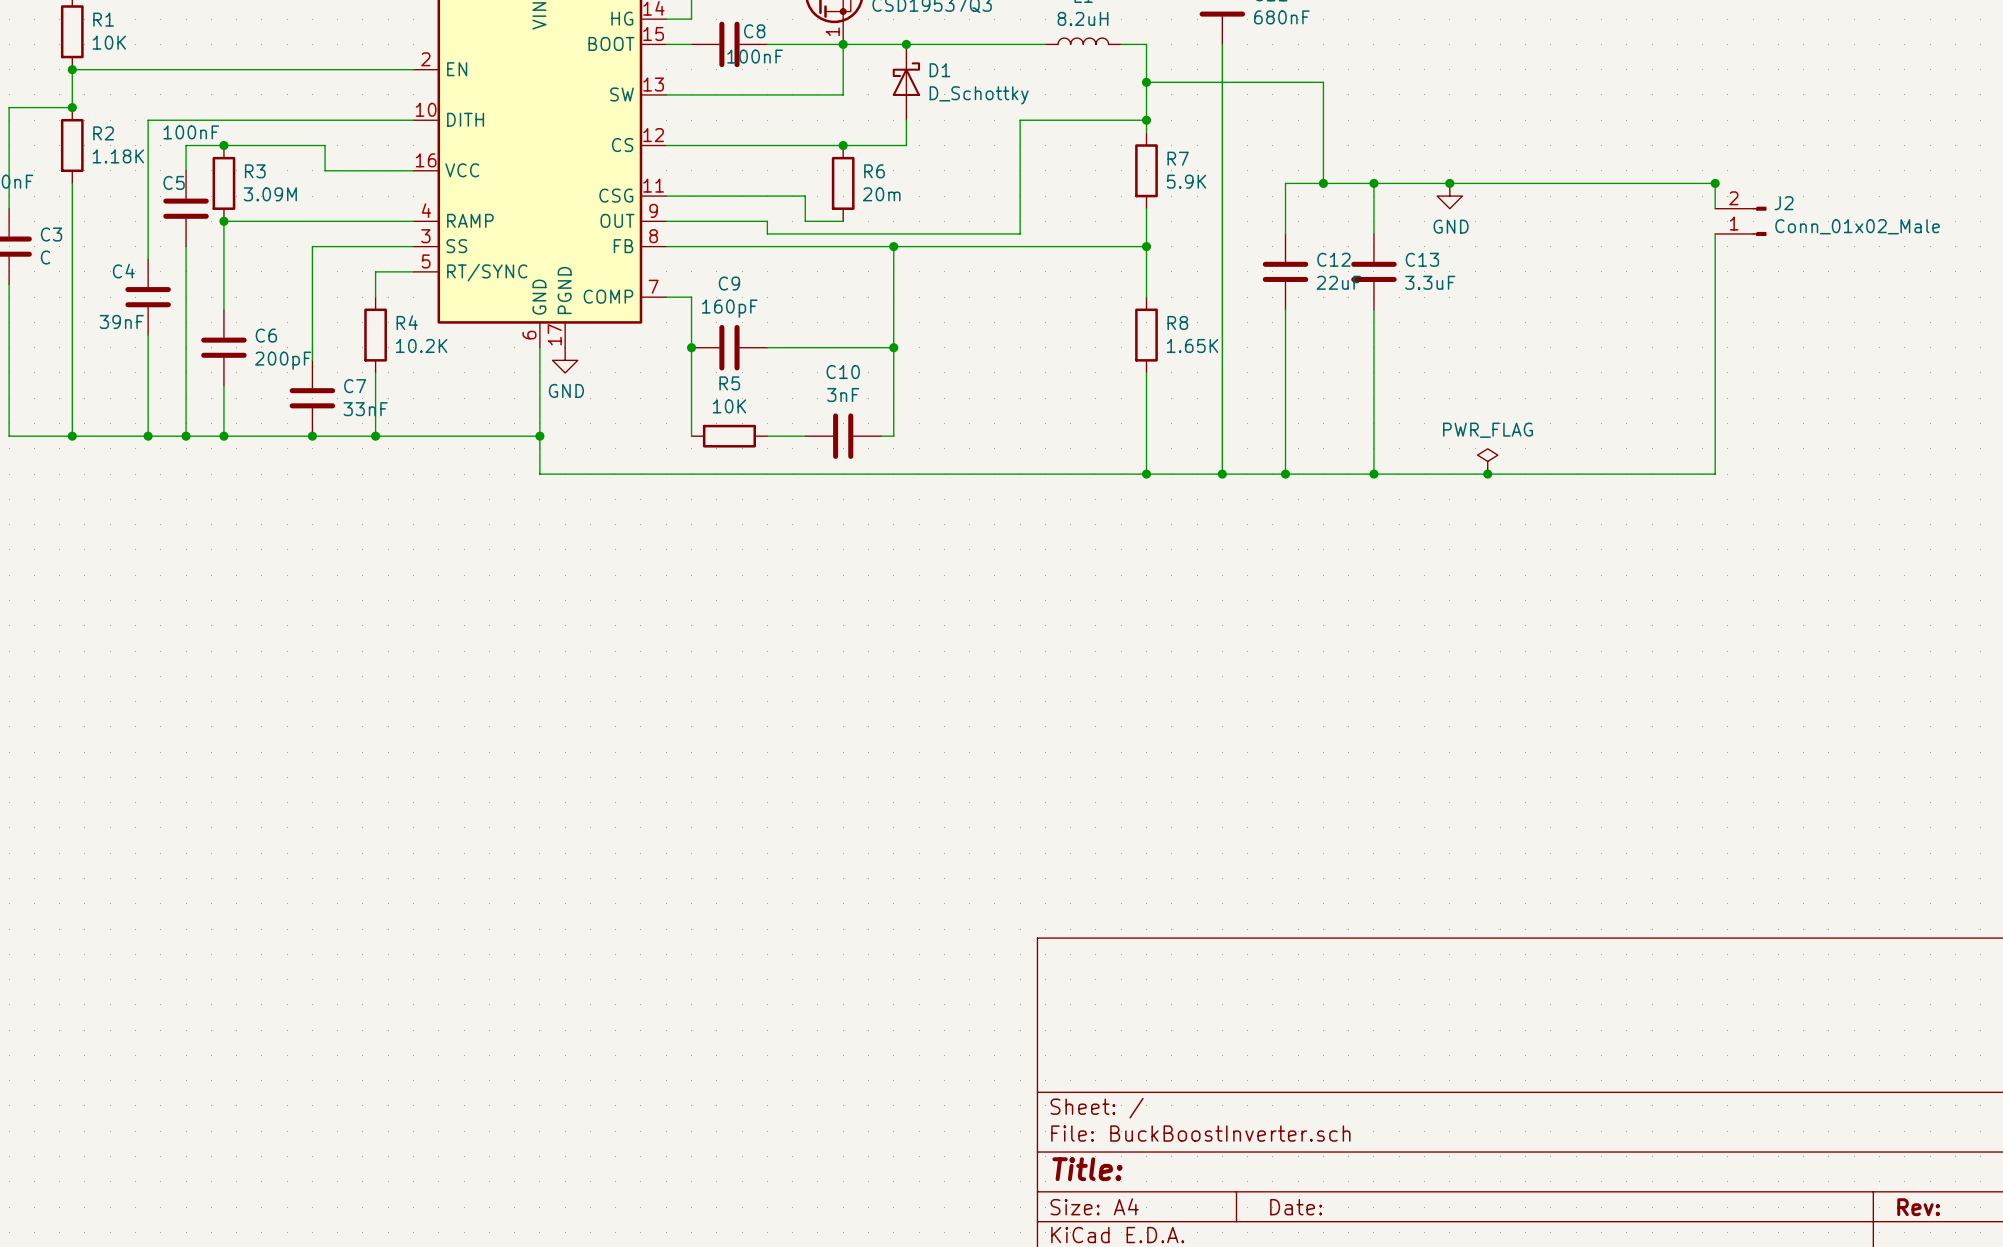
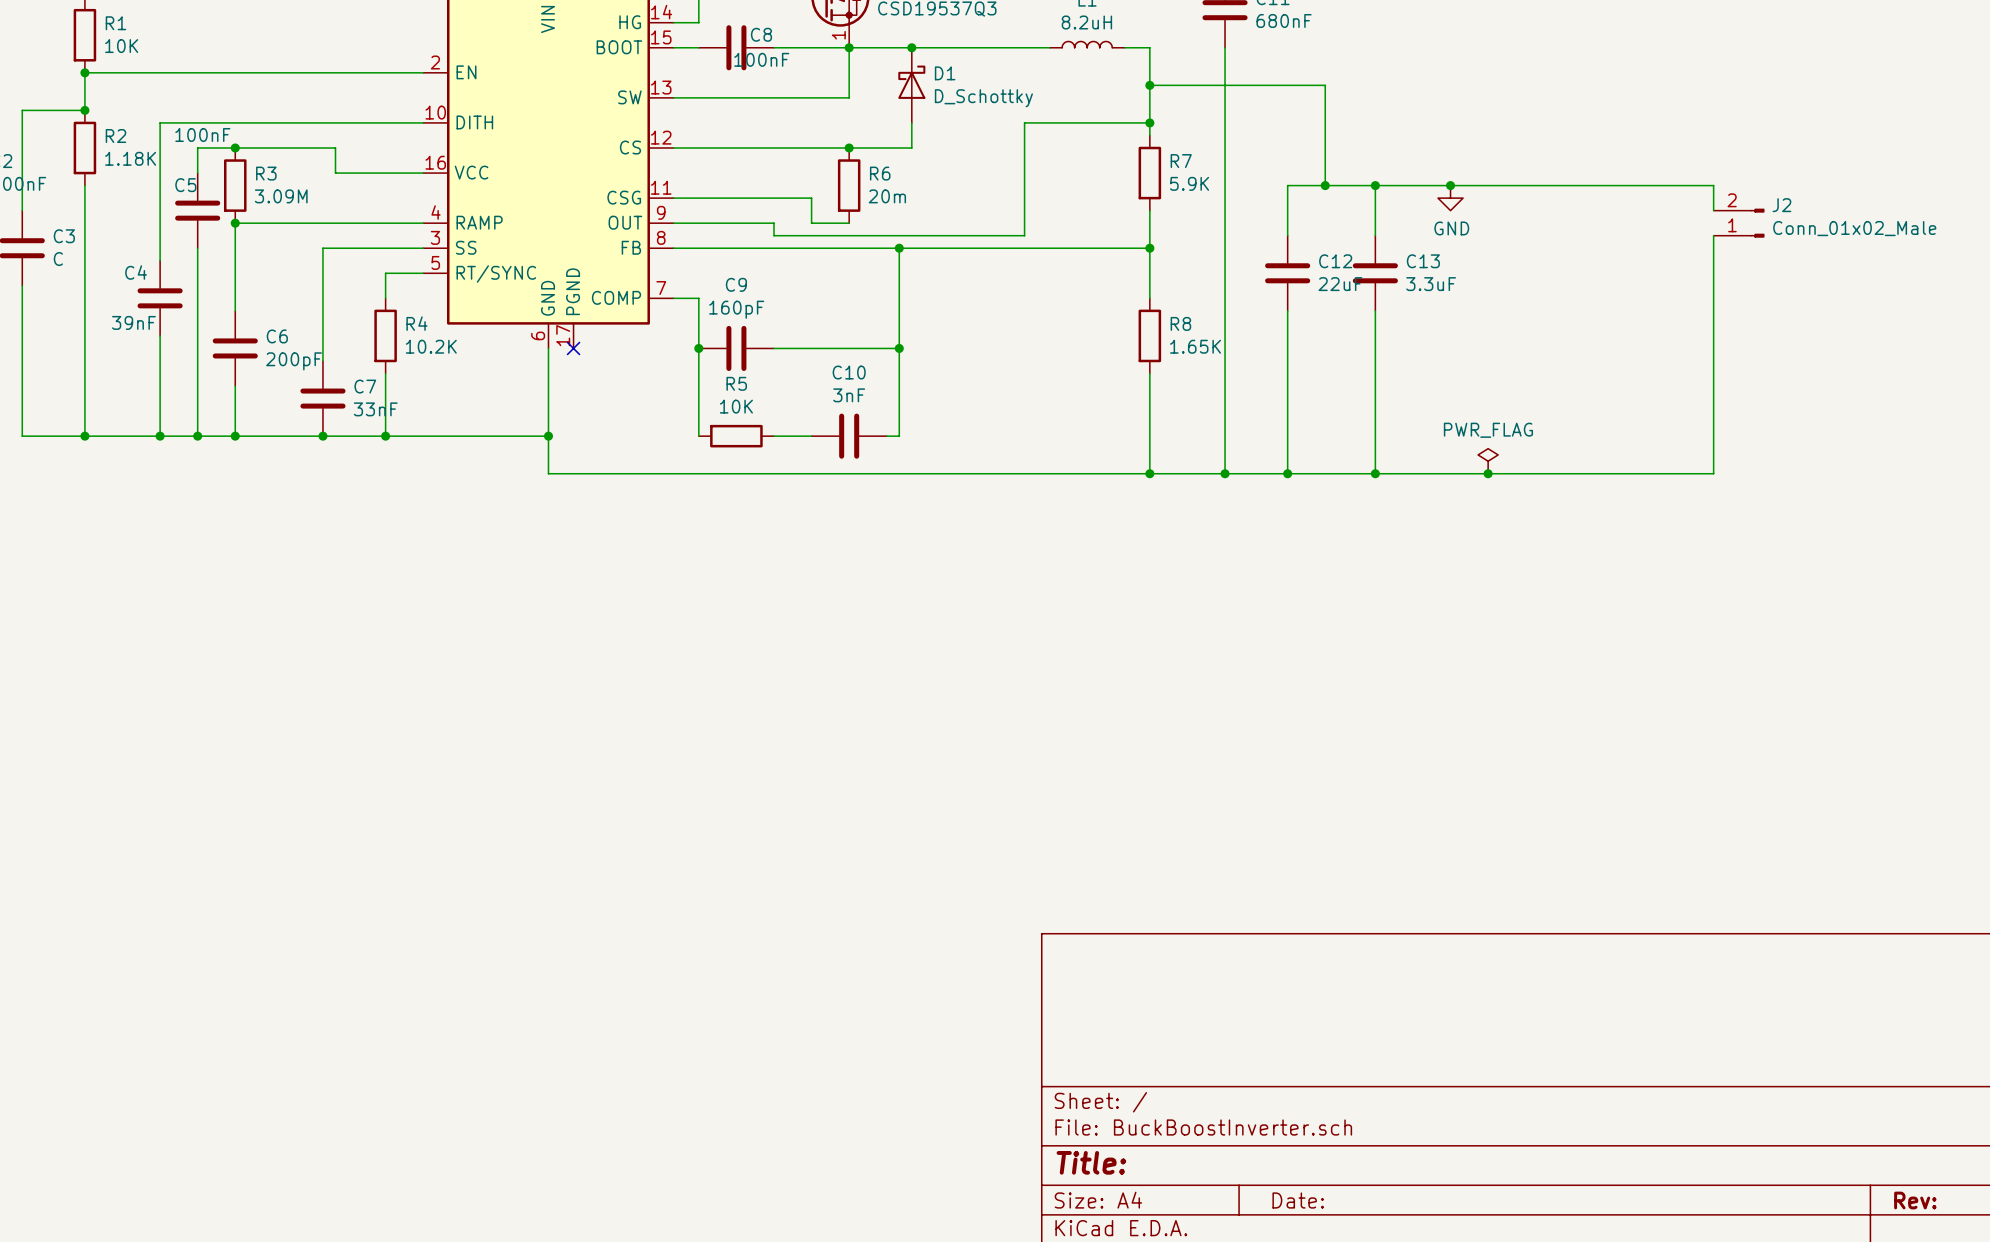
junction: (1715, 183) -> none
no-connect mark: none -> (573, 348)
power symbol: GND (565, 360) -> none

